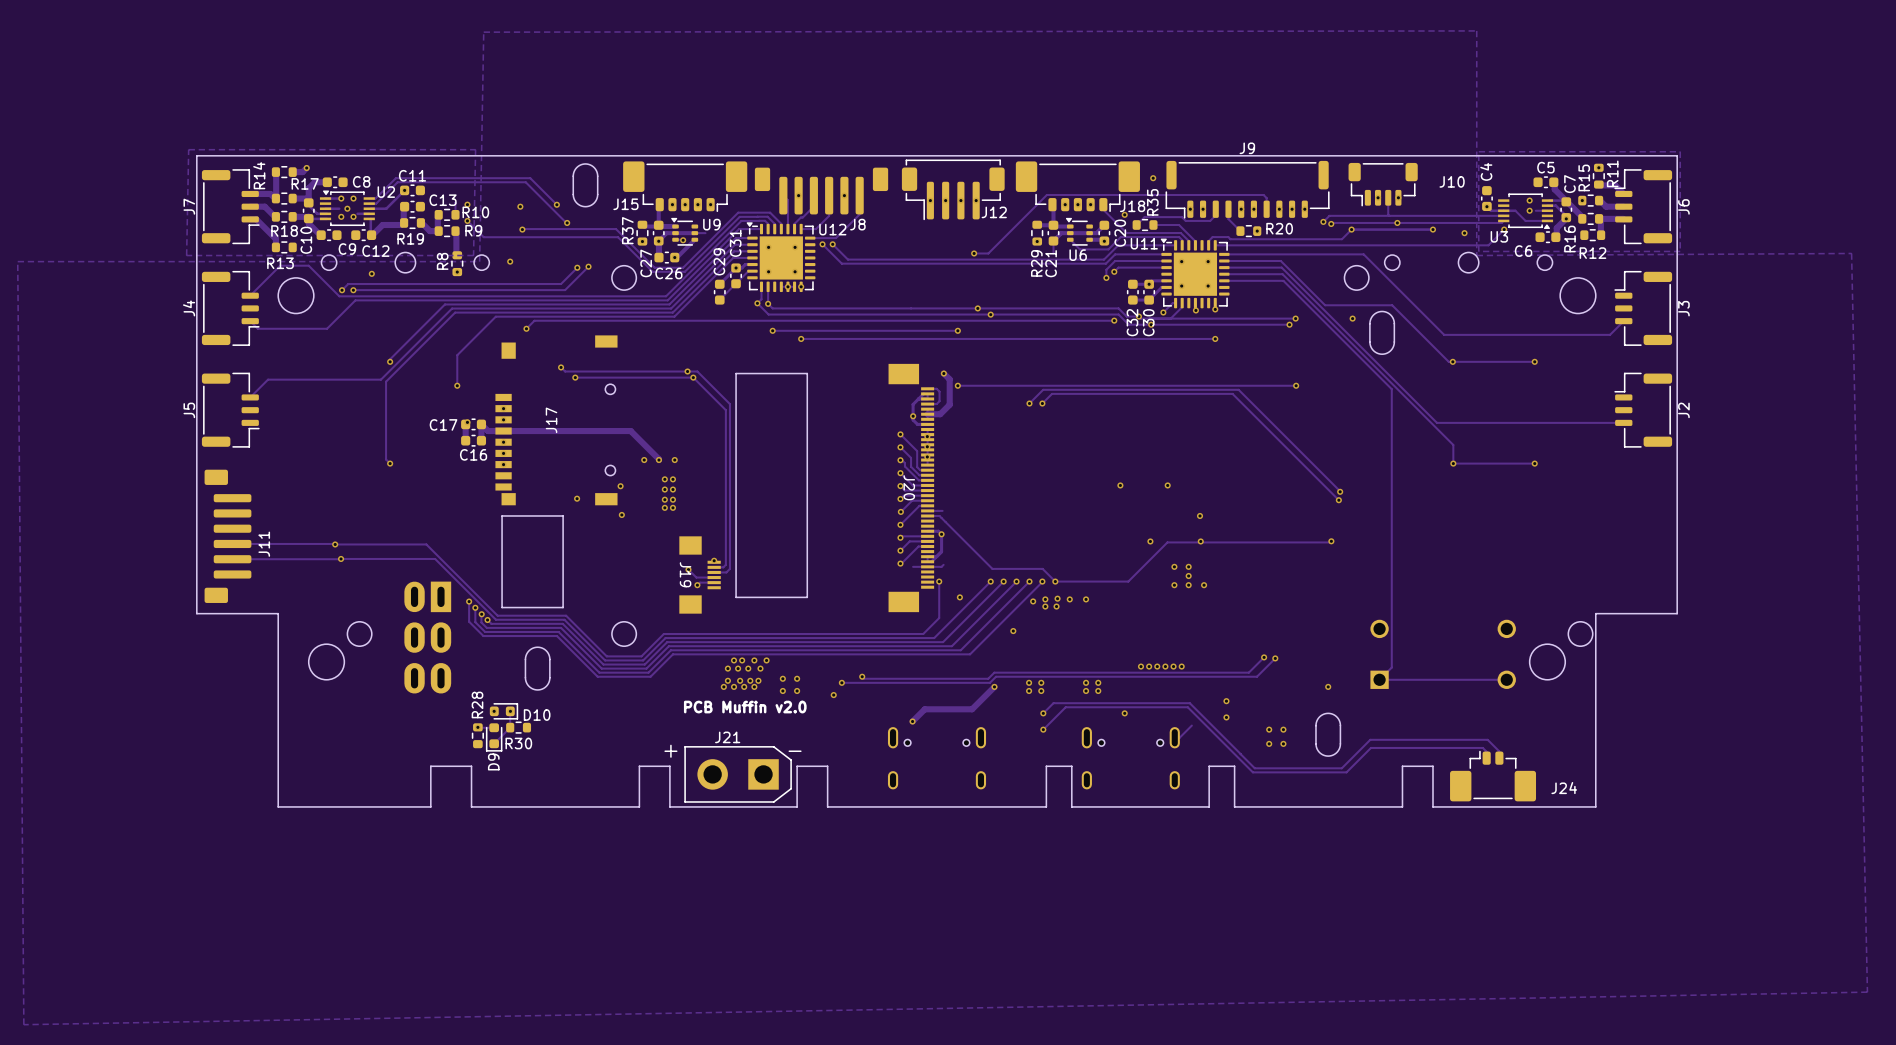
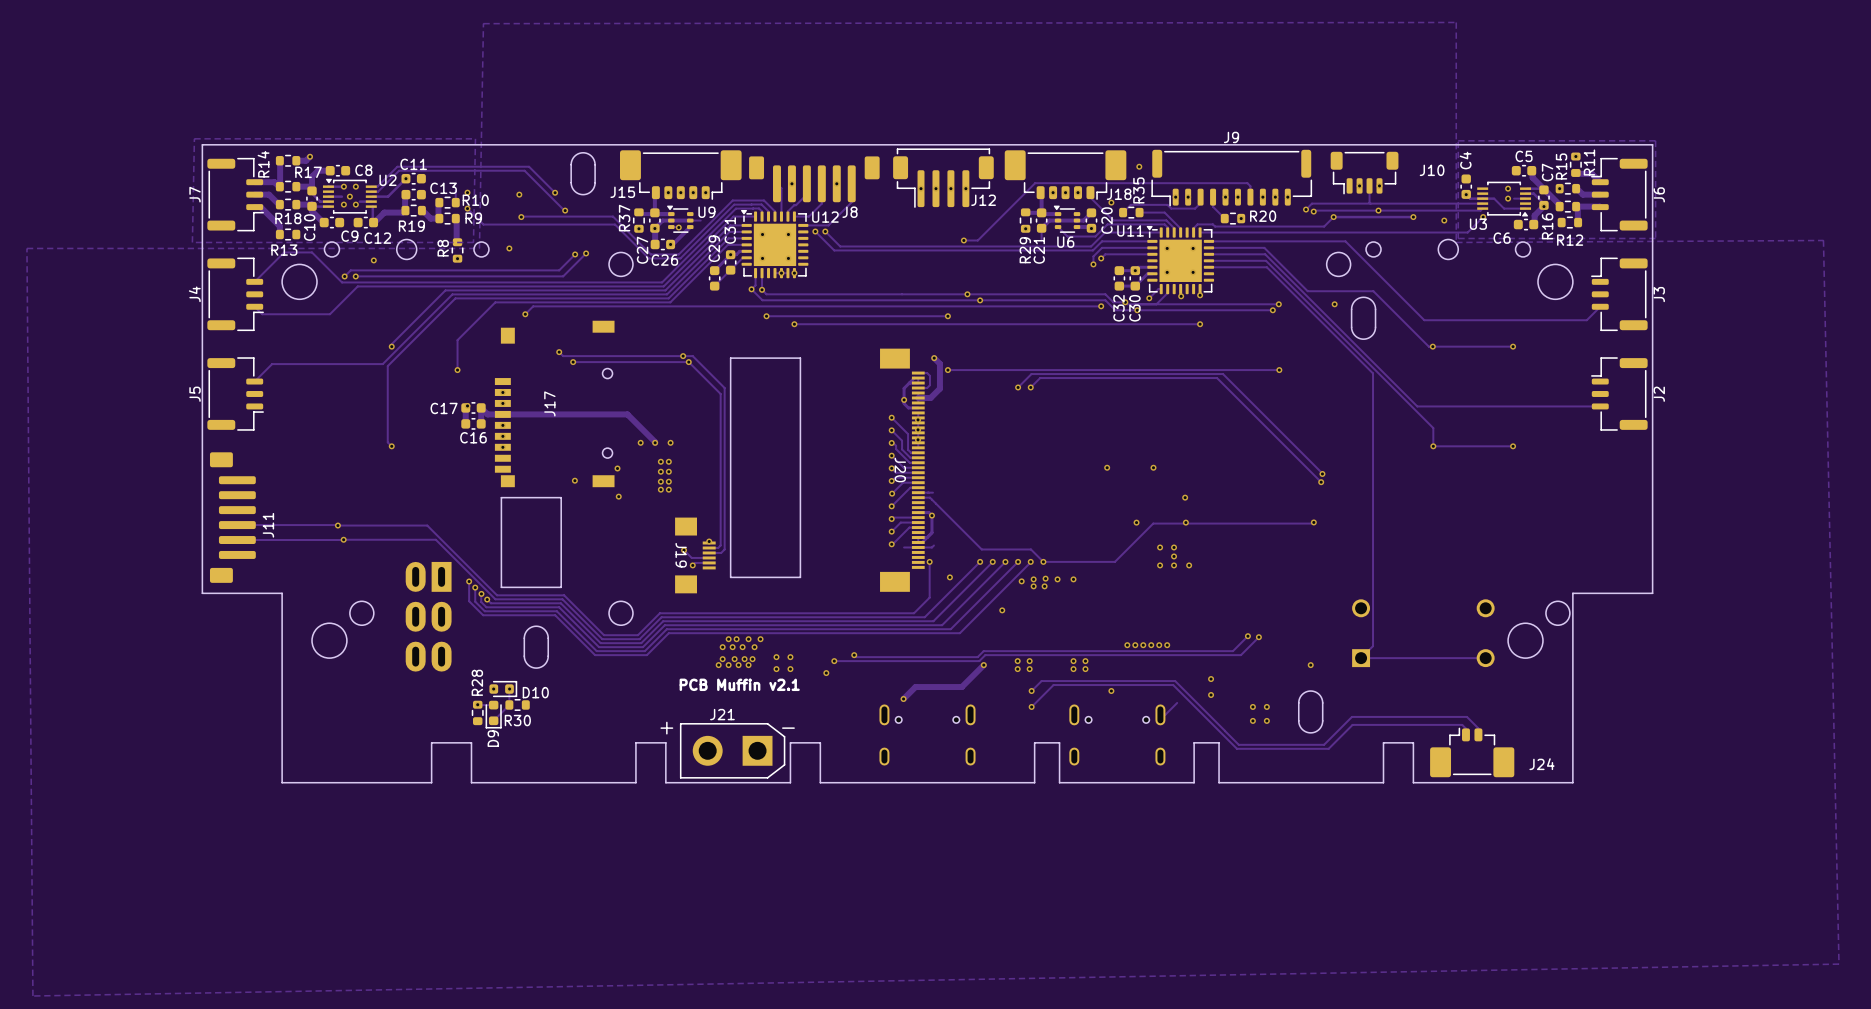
text: PCB Muffin v2.0 (745, 707) -> PCB Muffin v2.1 (739, 684)

